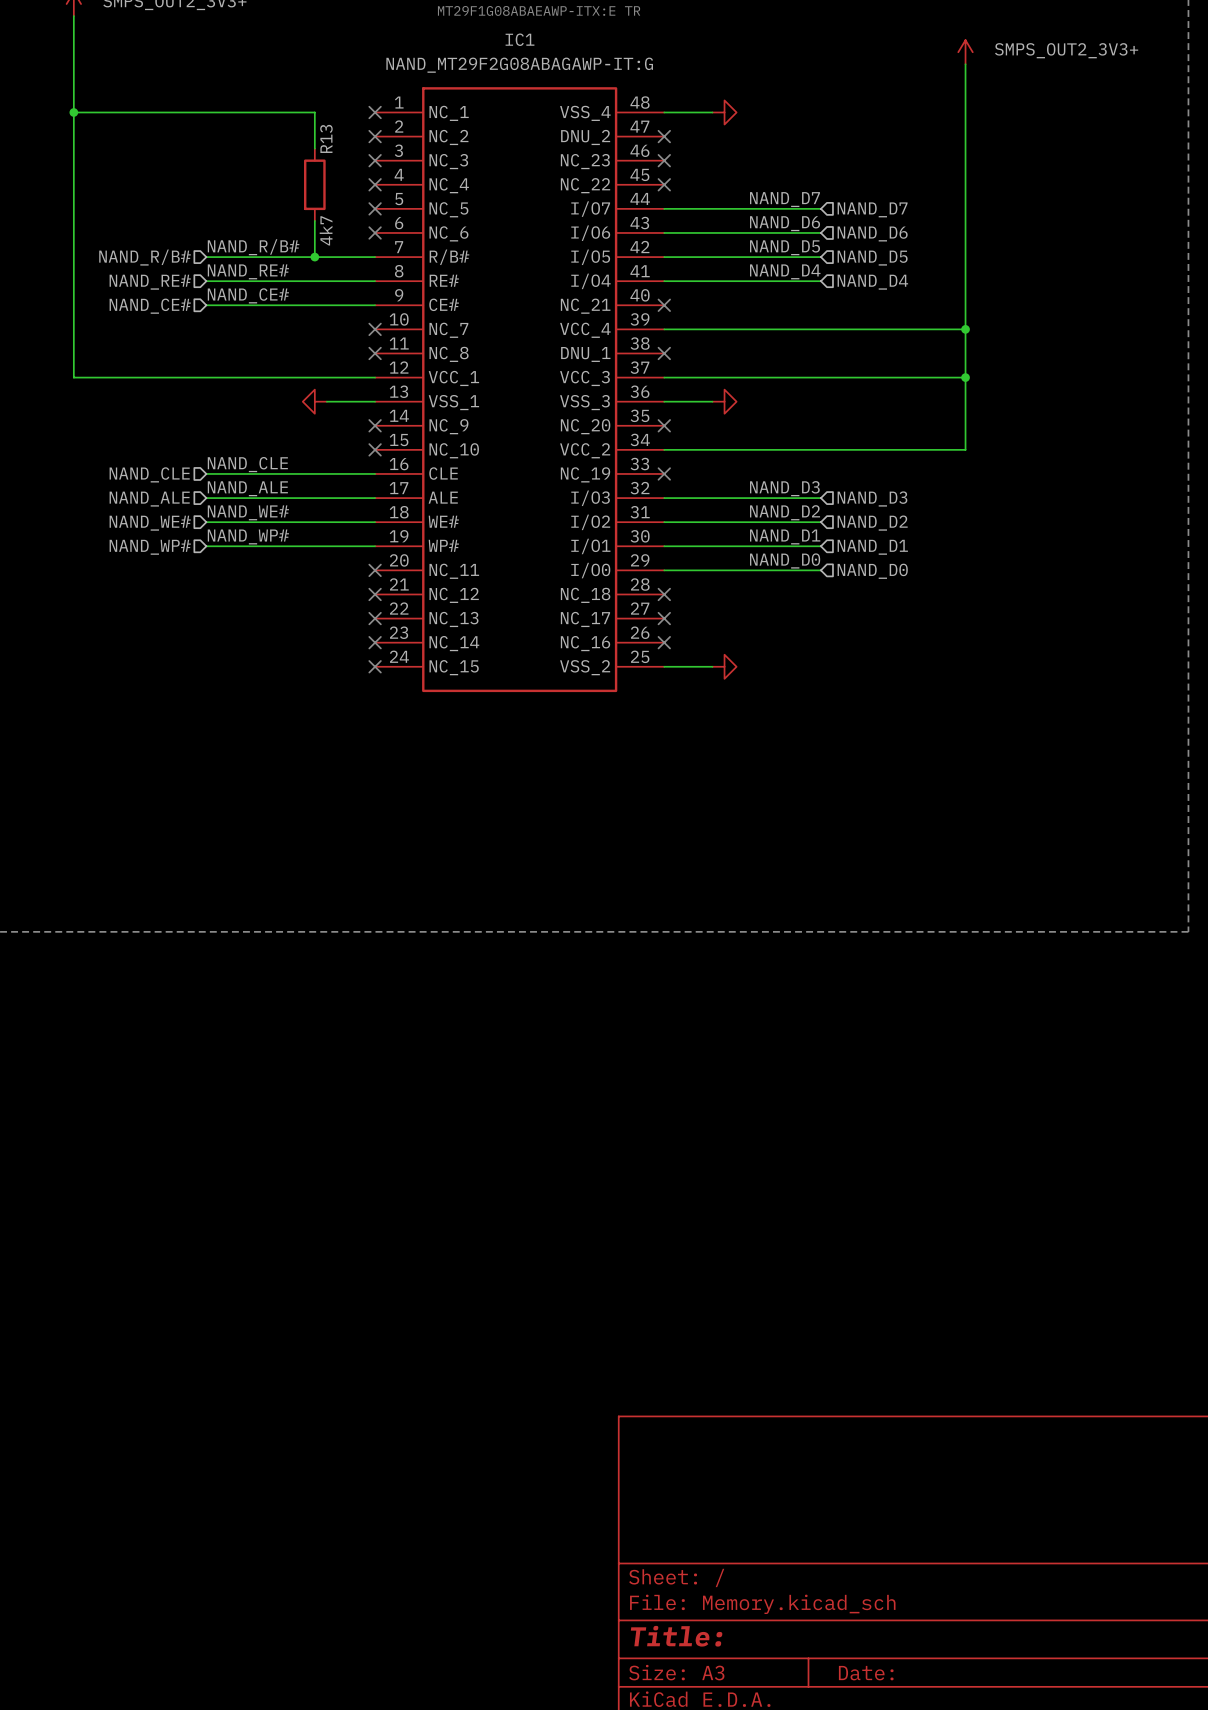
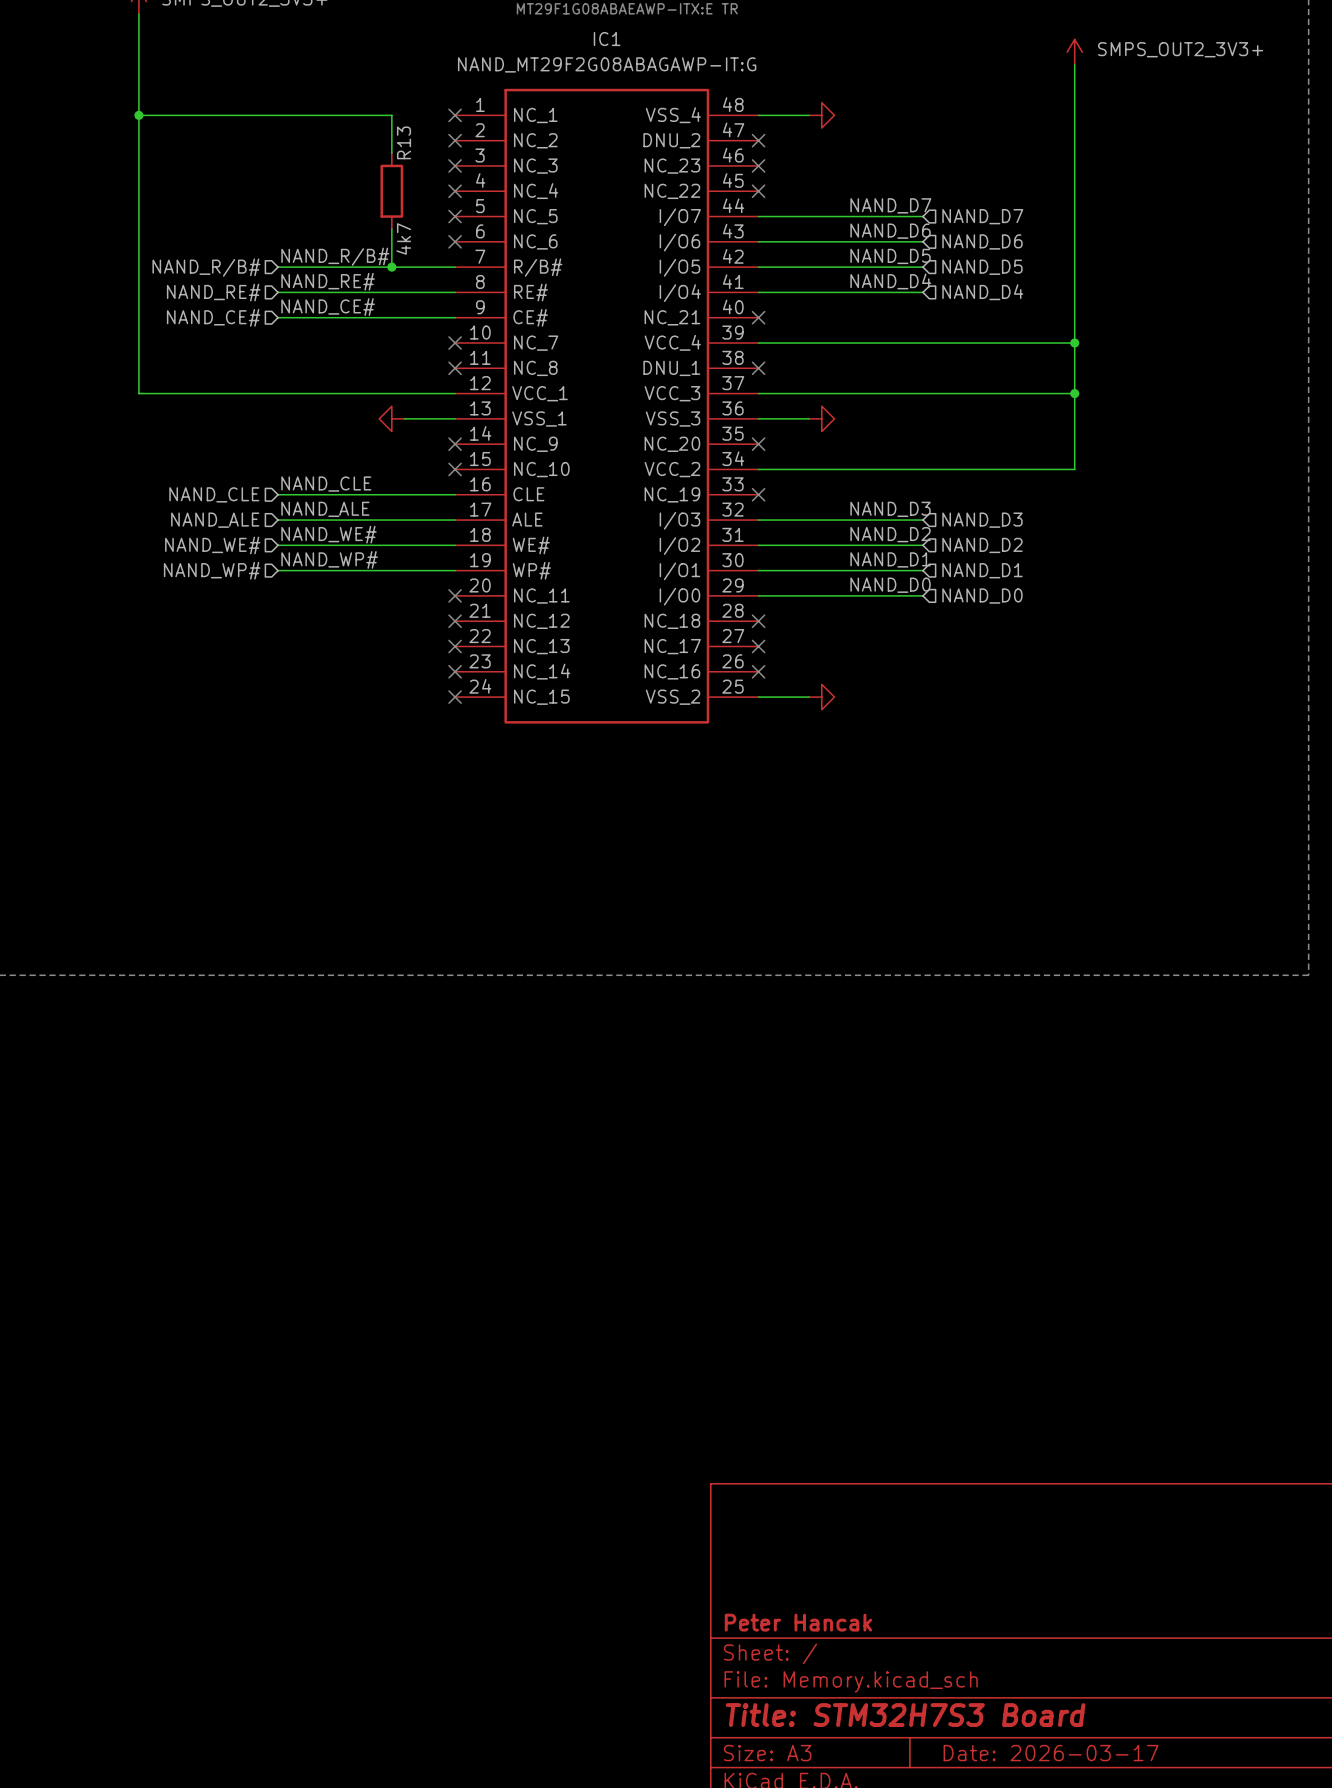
title block: none -> Peter Hancak (798, 1622)
title block: Title: (676, 1636) -> Title: STM32H7S3 Board (905, 1715)
title block: Date: (866, 1673) -> Date: 2026-03-17 (1051, 1753)

